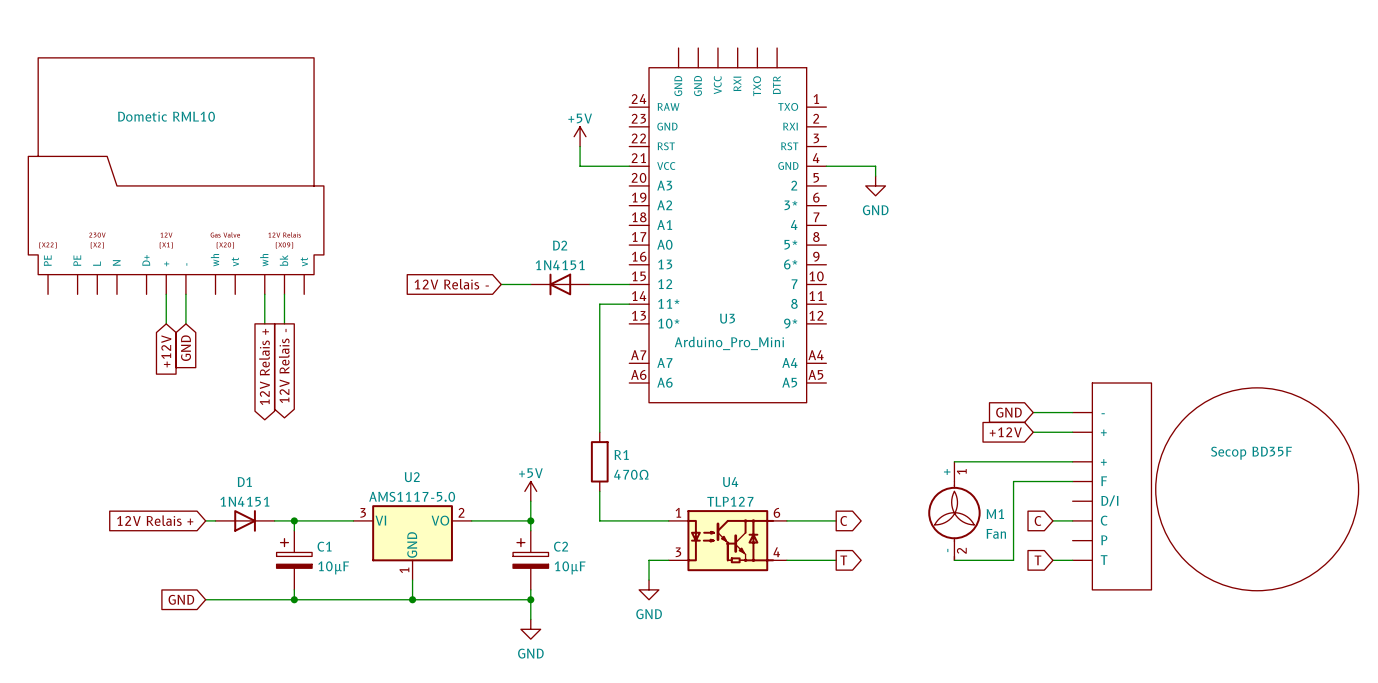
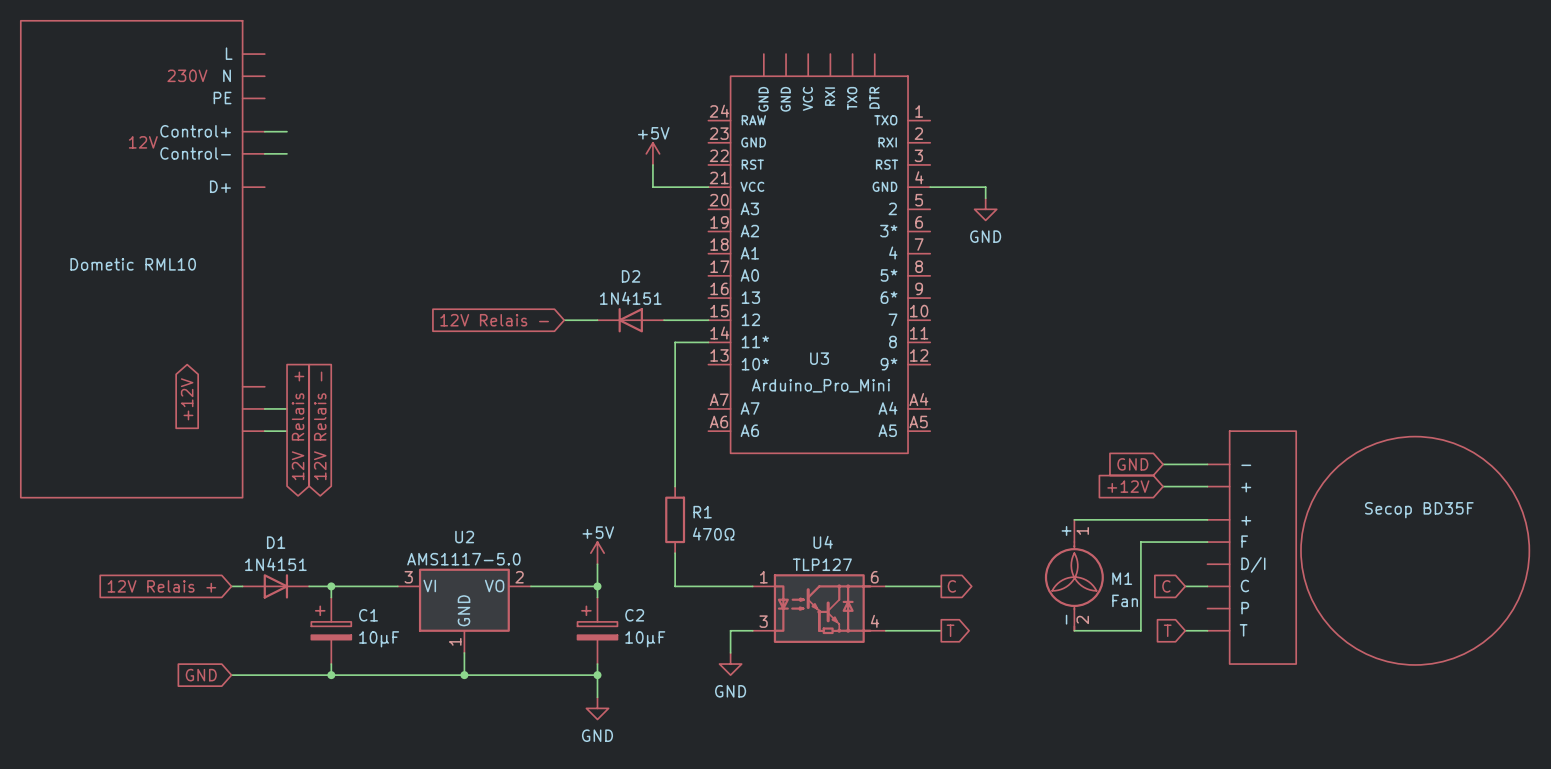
wire: none -> (264, 131) (286, 131)
wire: none -> (264, 153) (286, 153)
part: Dometic RML10 (176, 175) -> none
part: none -> Dometic RML10 (142, 259)
wire: (166, 294) (166, 323) -> none
wire: (185, 294) (185, 323) -> none
wire: (264, 294) (264, 323) -> none
wire: (284, 294) (284, 323) -> none
global label: GND (186, 348) -> none
wire: none -> (264, 408) (286, 408)
wire: none -> (264, 431) (286, 431)

